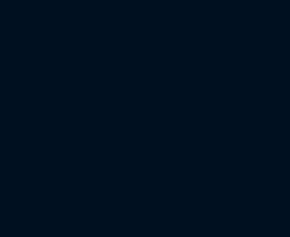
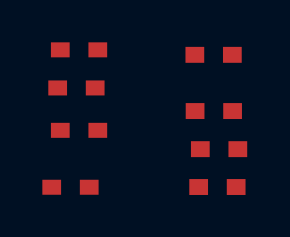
part: none -> (79, 49)
part: none -> (213, 54)
part: none -> (76, 87)
part: none -> (213, 111)
part: none -> (79, 130)
part: none -> (219, 149)
part: none -> (70, 187)
part: none -> (217, 187)

